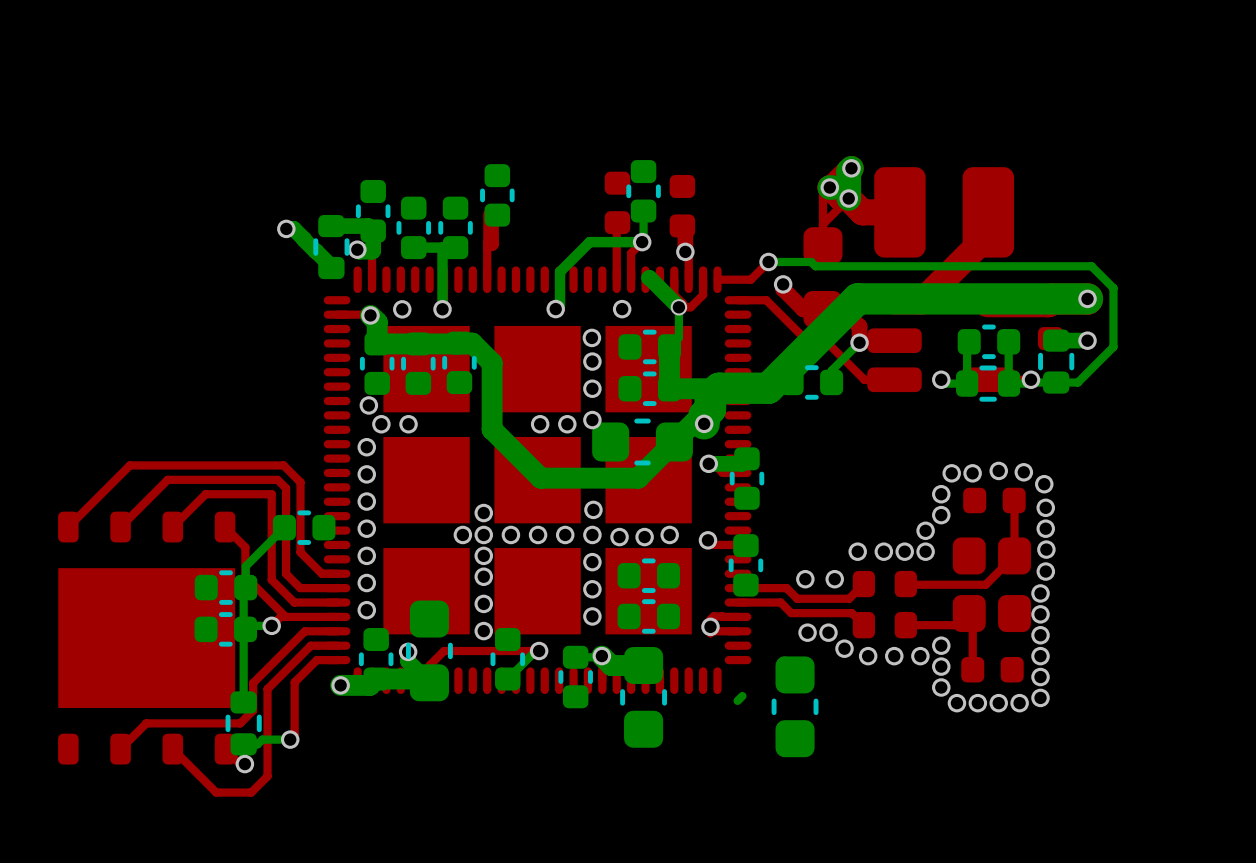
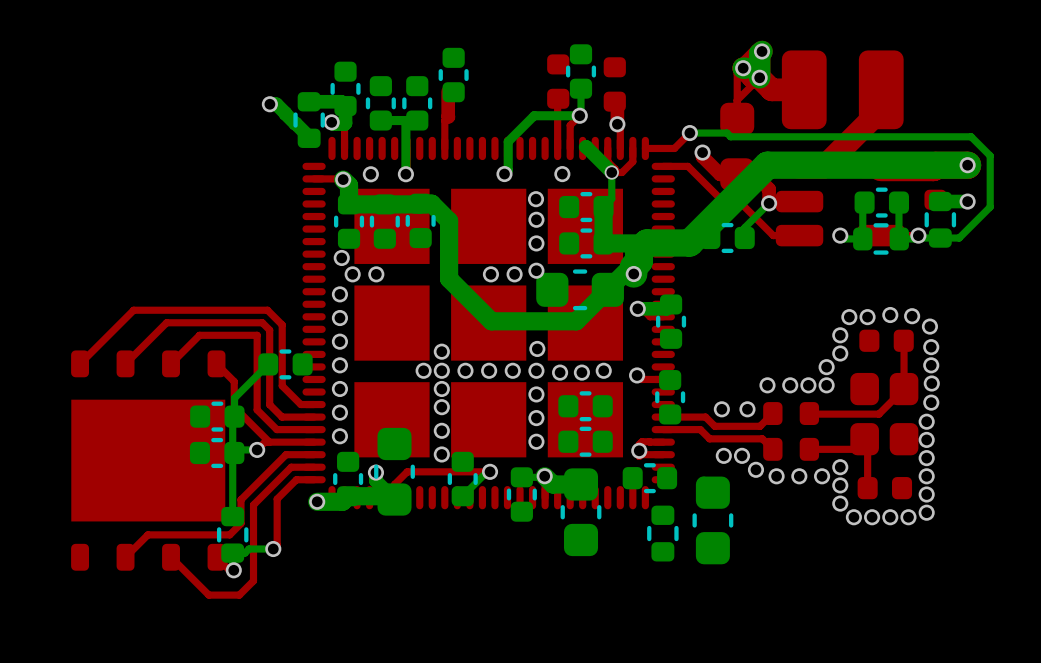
part: none -> (649, 478)
part: none -> (662, 533)

